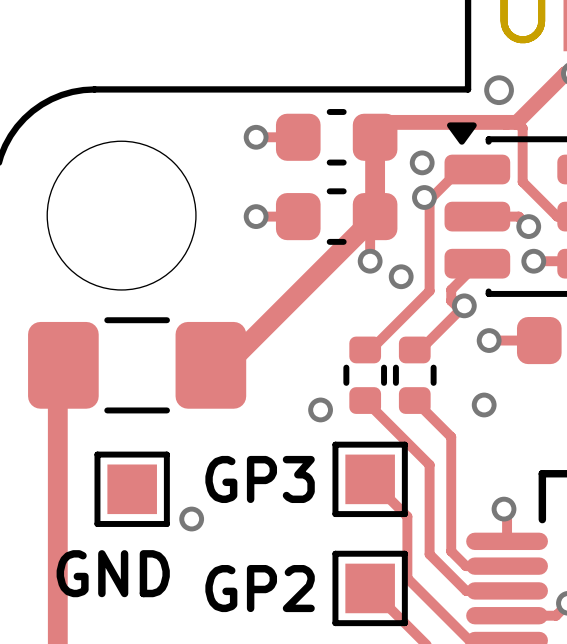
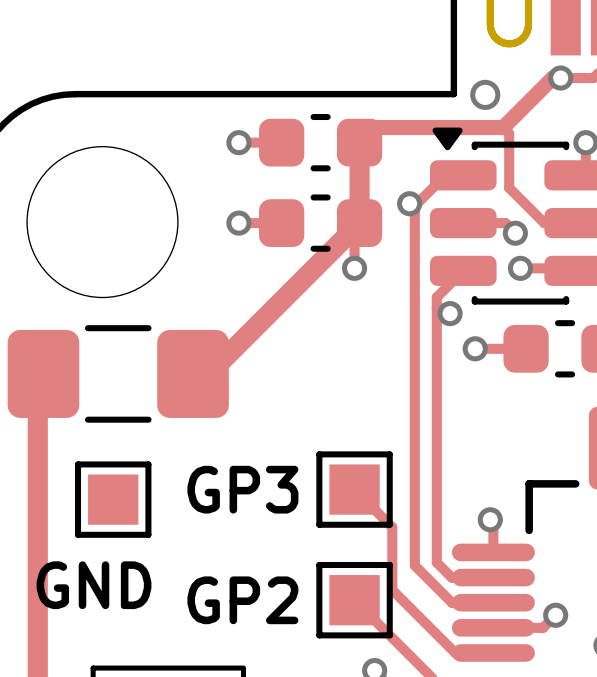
via: (422, 162) -> none
via: (401, 276) -> none
track: (429, 291) (370, 349) (365, 349) -> none
track: (464, 305) (420, 349) (414, 349) -> none
part: (365, 375) -> none
part: (414, 375) -> none
track: (365, 400) (429, 464) -> (414, 298) (414, 474)
track: (414, 400) (451, 437) -> (436, 308) (436, 446)
via: (484, 405) -> none
via: (320, 409) -> none
via: (191, 519) -> none

